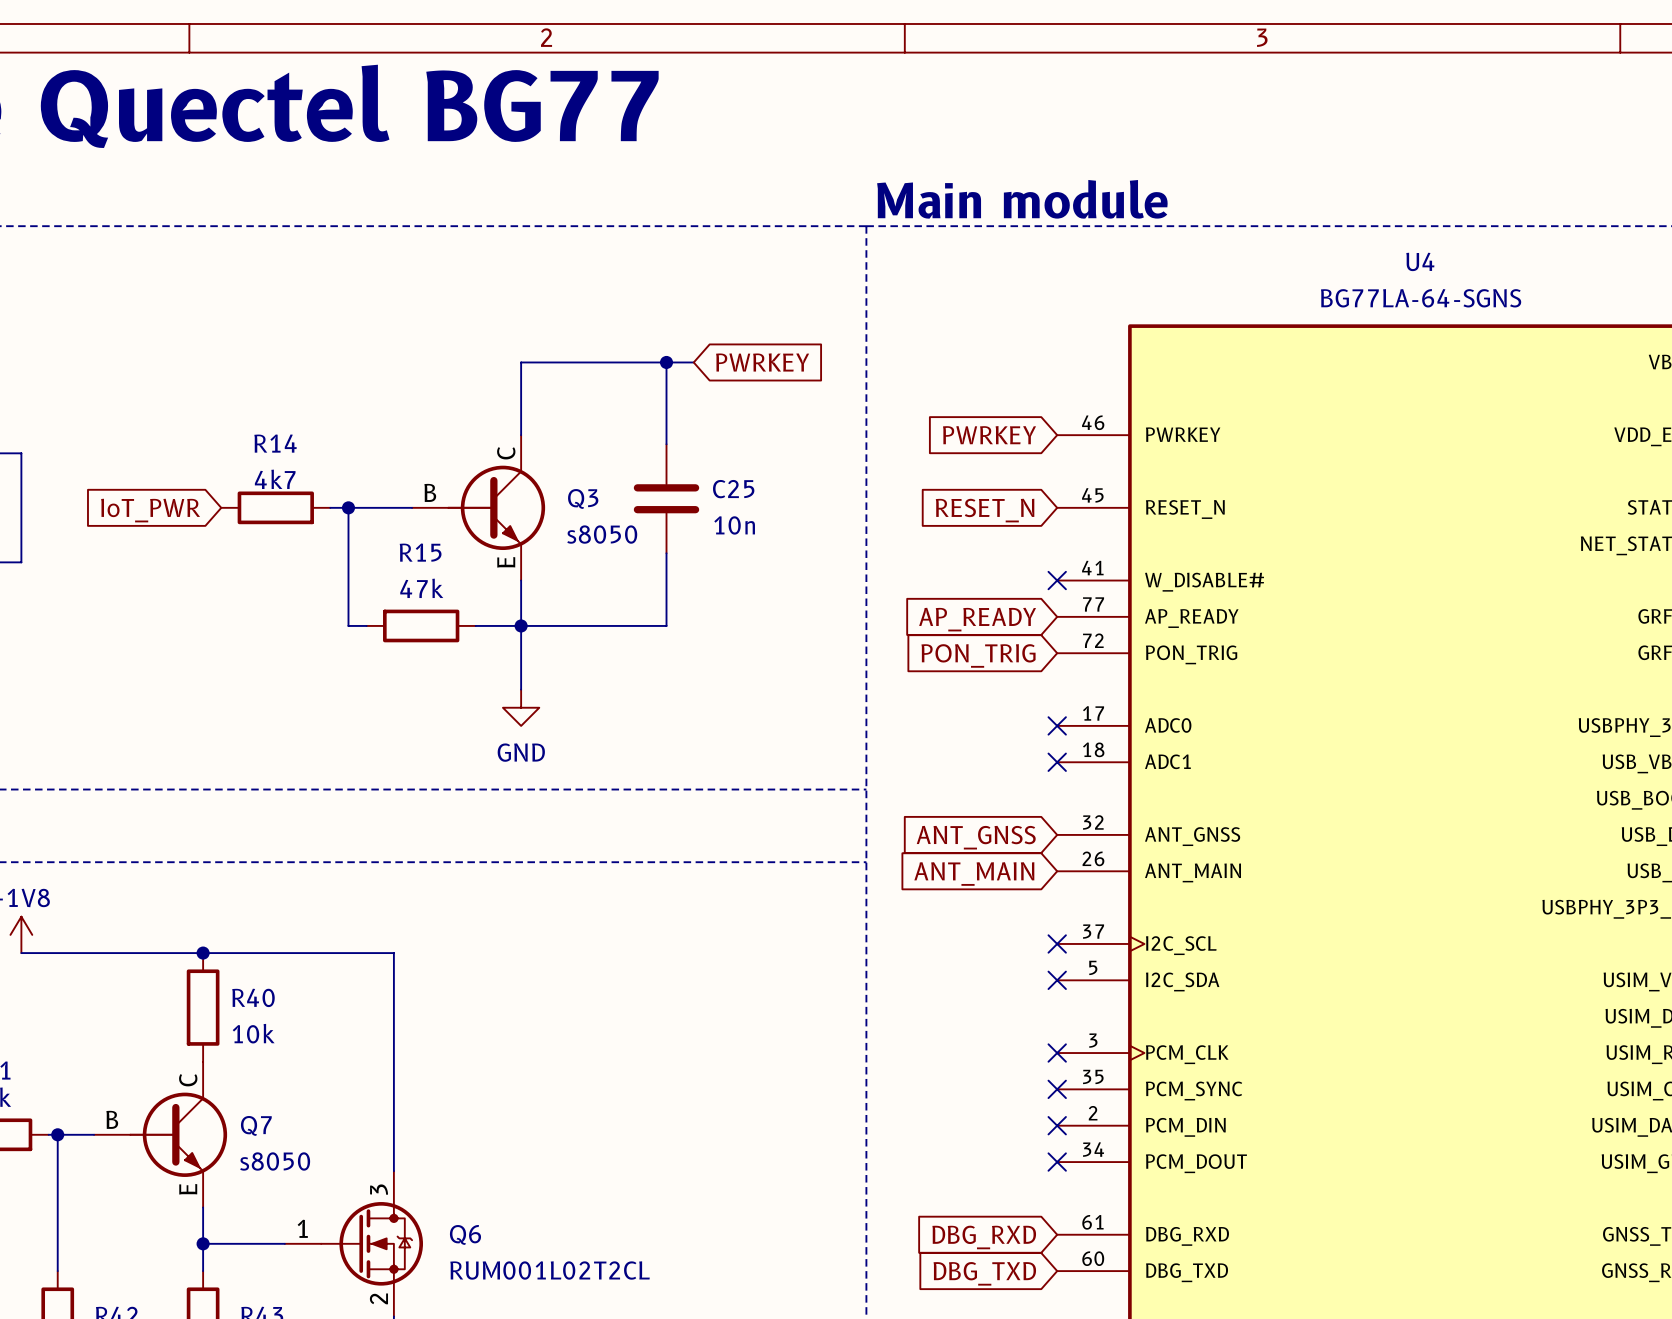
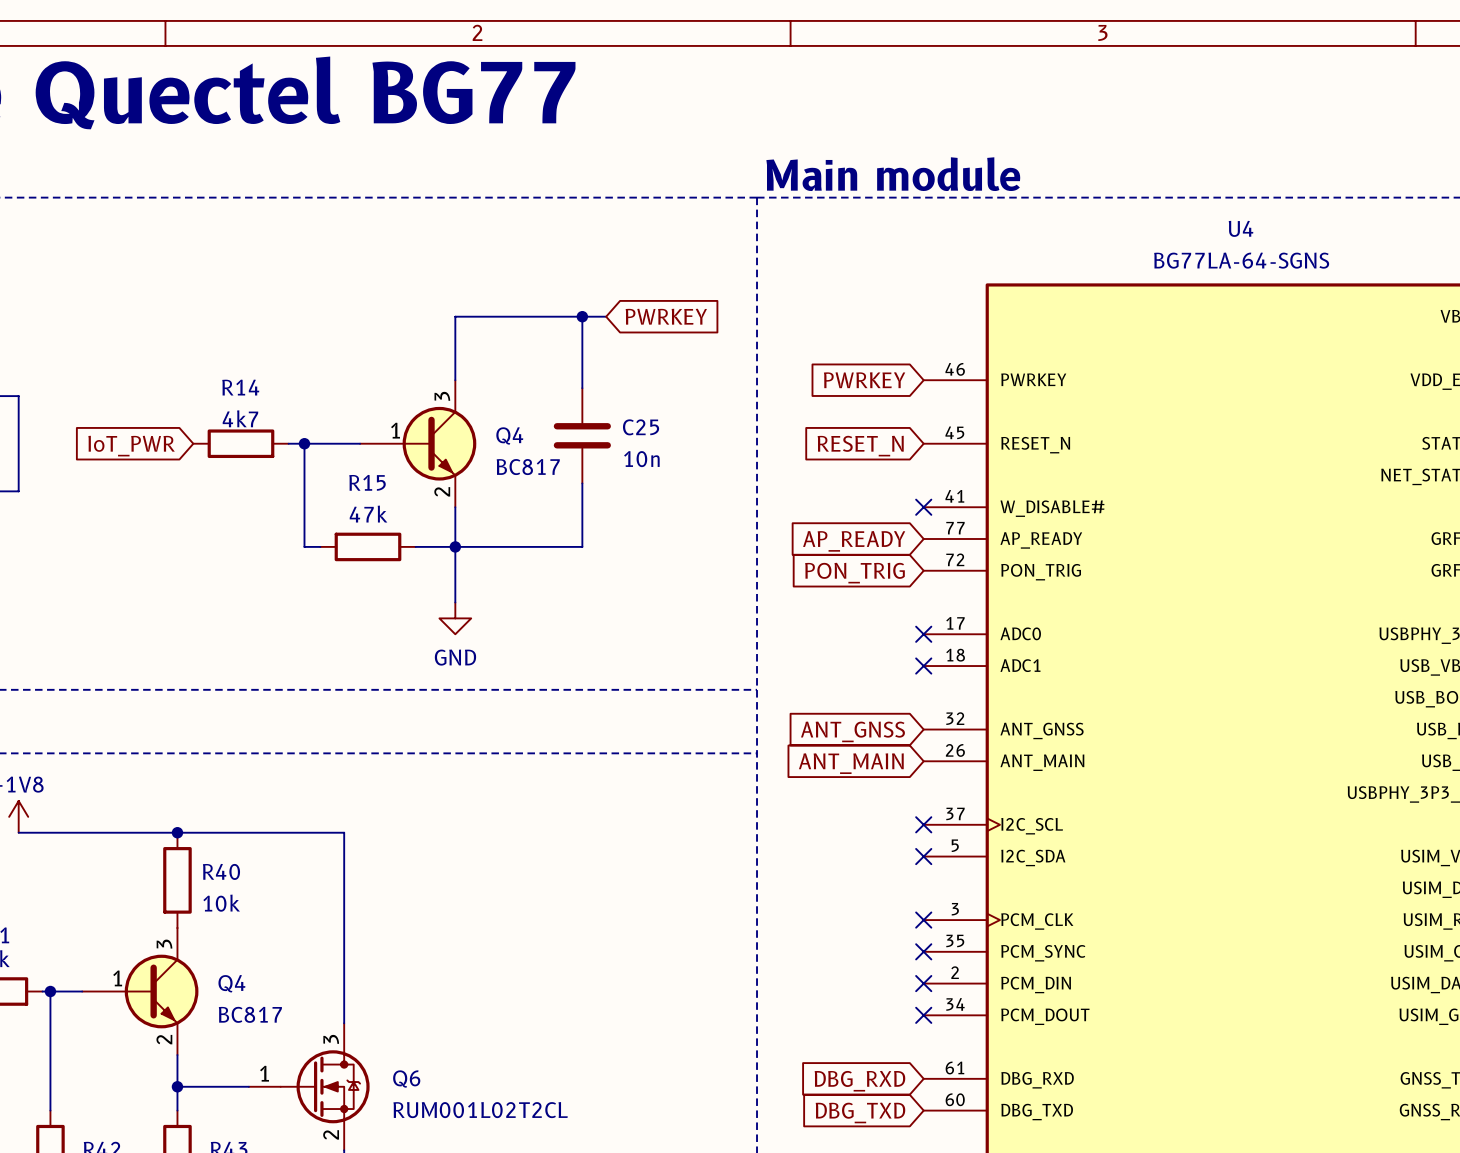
Q3: s8050 (478, 507) -> none
Q4: none -> BC817 (418, 443)
Q7: s8050 (160, 1134) -> none
Q4: none -> BC817 (140, 991)

